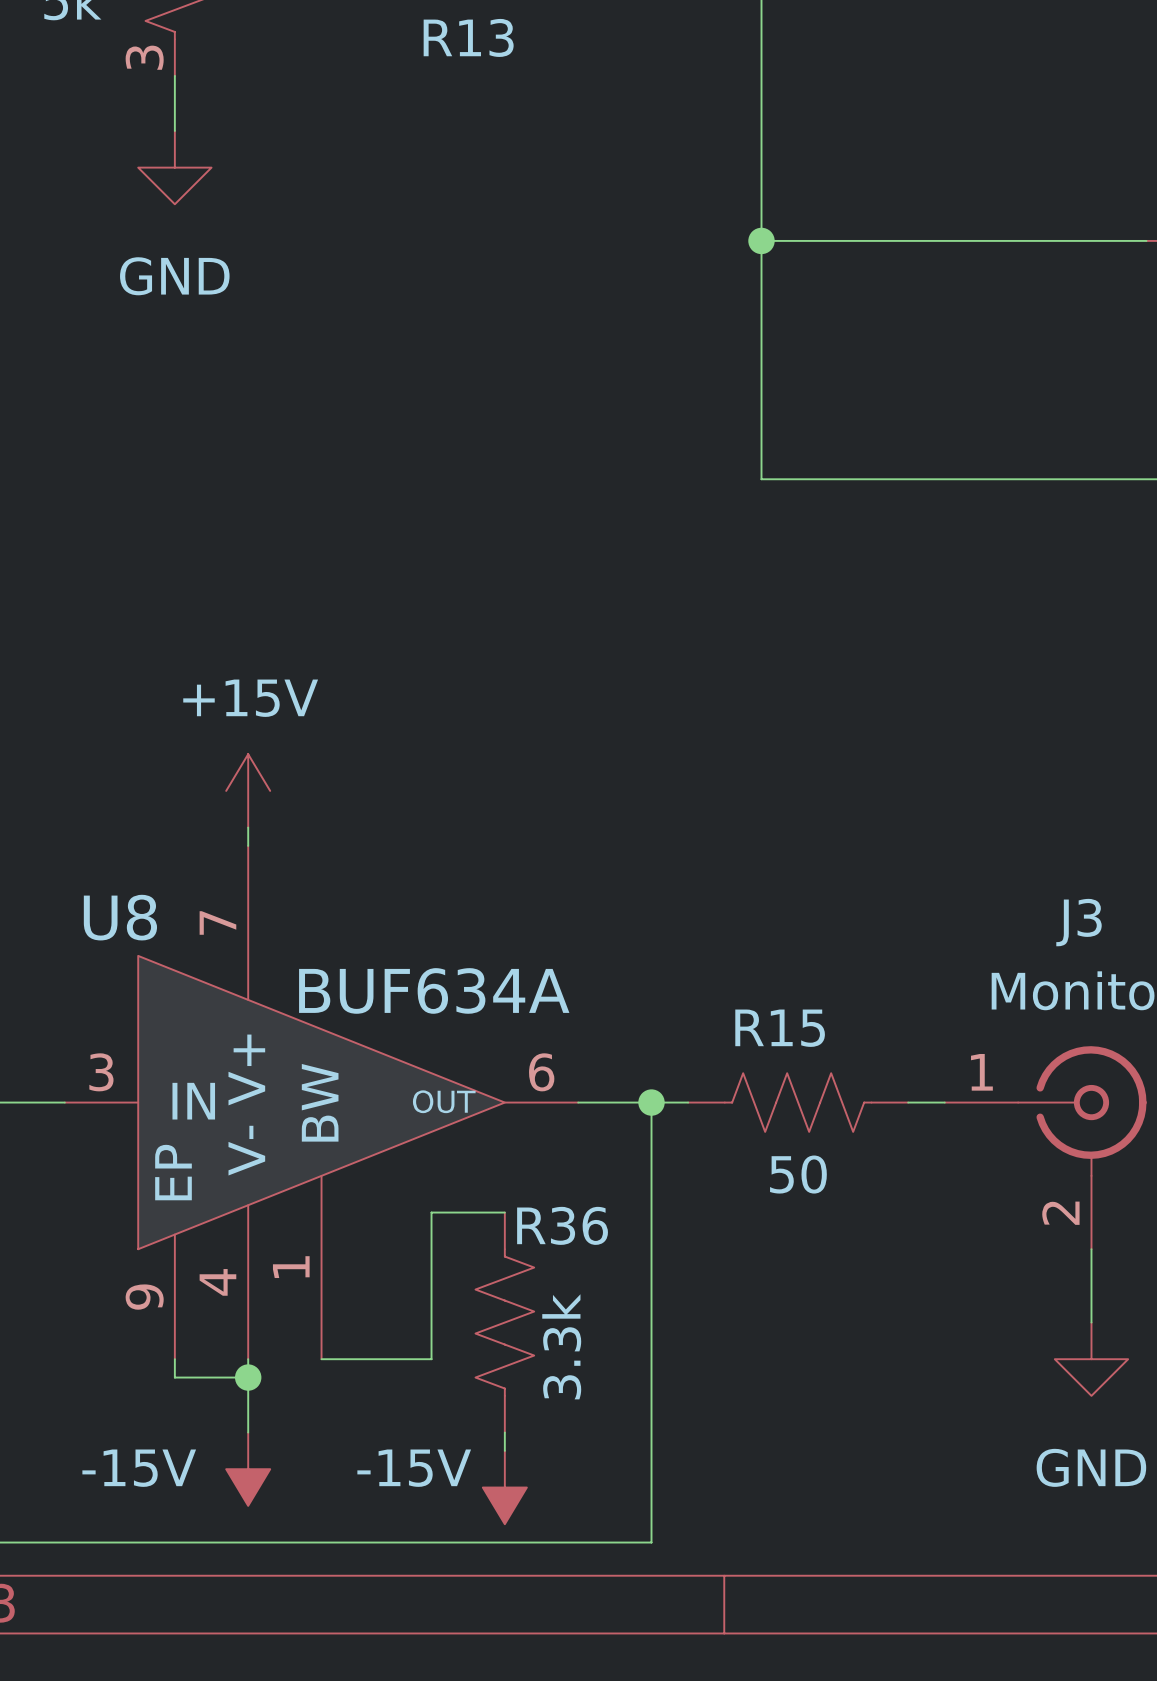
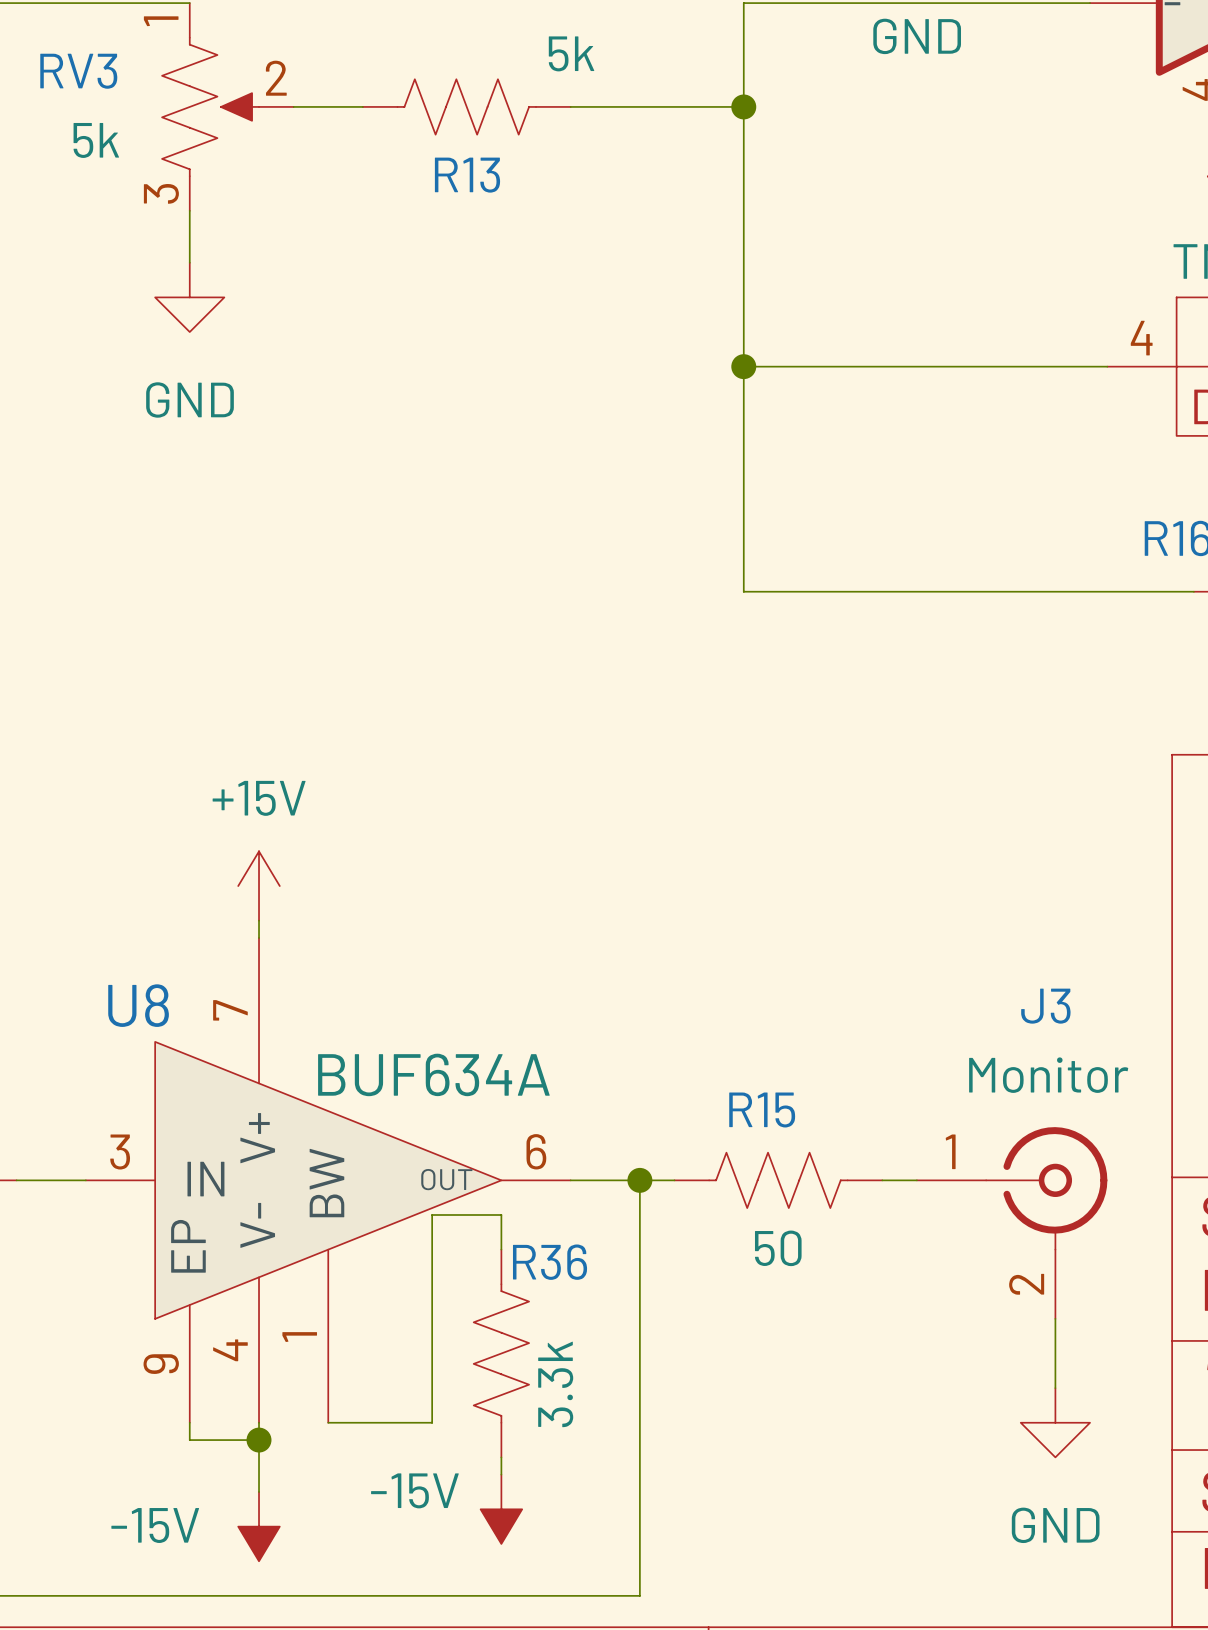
wire: (431, 1212) (504, 1212) -> (432, 1284) (432, 1214) (501, 1214) (501, 1249)
R36 position: (504, 1322) -> (501, 1353)
power symbol position: -15V (504, 1487) -> -15V (501, 1509)

